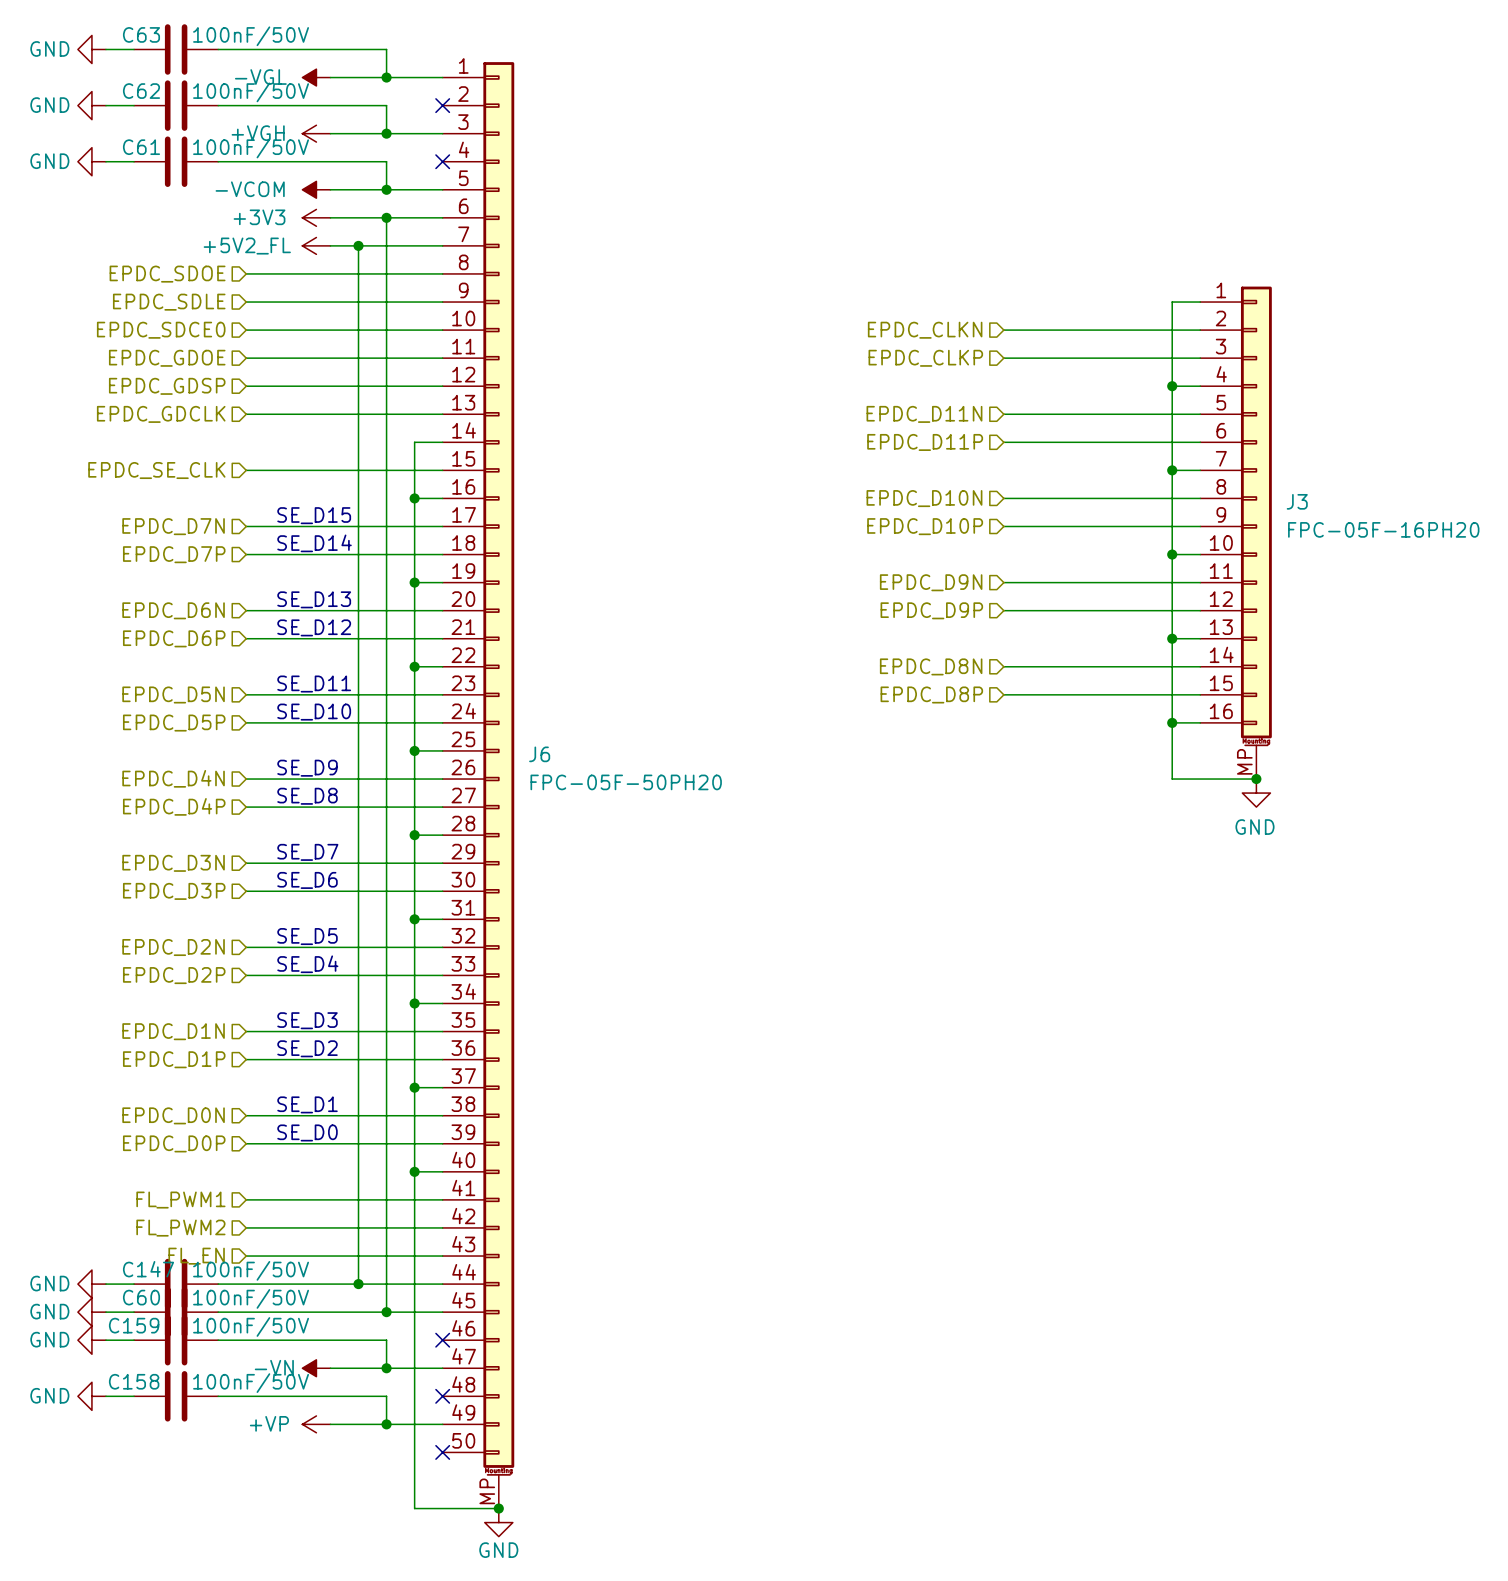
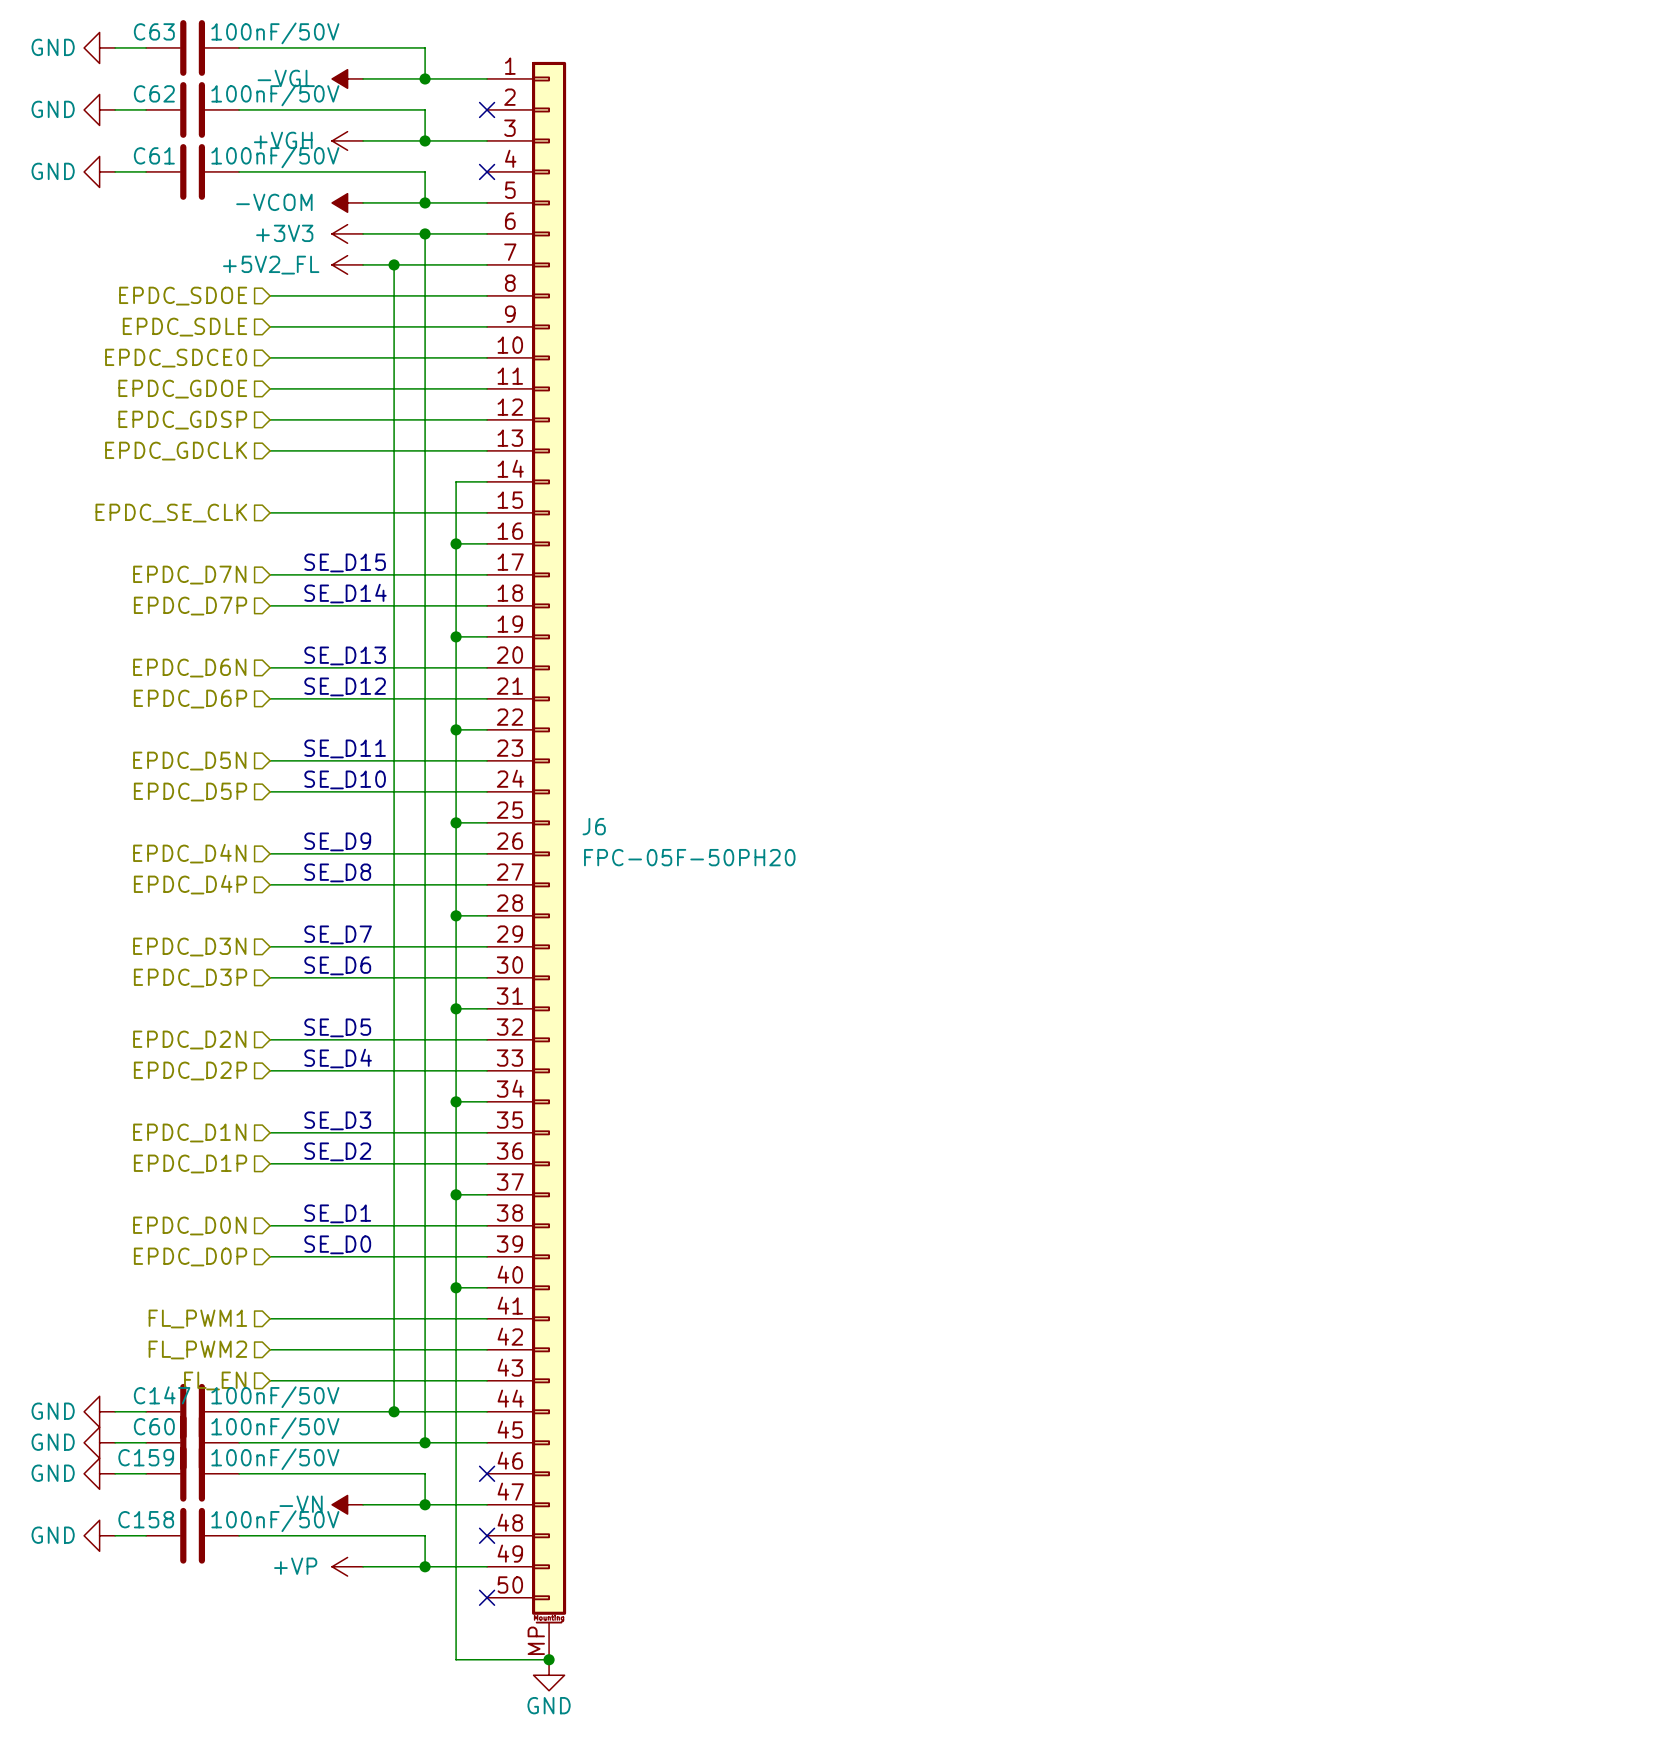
wire: (1200, 302) (1172, 302) (1172, 779) (1256, 779) -> none
hierarchical label: EPDC_CLKN (925, 330) -> none
wire: (1003, 330) (1200, 330) -> none
hierarchical label: EPDC_CLKP (925, 358) -> none
wire: (1003, 358) (1200, 358) -> none
wire: (1172, 386) (1200, 386) -> none
junction: (1172, 386) -> none
hierarchical label: EPDC_D11N (924, 414) -> none
wire: (1003, 414) (1200, 414) -> none
hierarchical label: EPDC_D11P (925, 442) -> none
wire: (1003, 442) (1200, 442) -> none
wire: (1172, 470) (1200, 470) -> none
junction: (1172, 470) -> none
hierarchical label: EPDC_D10N (924, 498) -> none
wire: (1003, 498) (1200, 498) -> none
hierarchical label: EPDC_D10P (925, 526) -> none
wire: (1003, 526) (1200, 526) -> none
J3: FPC-05F-16PH20 (1236, 532) -> none
wire: (1172, 554) (1200, 554) -> none
junction: (1172, 554) -> none
hierarchical label: EPDC_D9N (931, 582) -> none
wire: (1003, 582) (1200, 582) -> none
hierarchical label: EPDC_D9P (931, 610) -> none
wire: (1003, 610) (1200, 610) -> none
wire: (1172, 638) (1200, 638) -> none
junction: (1172, 638) -> none
hierarchical label: EPDC_D8N (931, 666) -> none
wire: (1003, 666) (1200, 666) -> none
hierarchical label: EPDC_D8P (931, 694) -> none
wire: (1003, 694) (1200, 694) -> none
wire: (1172, 722) (1200, 722) -> none
junction: (1172, 722) -> none
junction: (1256, 779) -> none
power symbol: GND (1256, 793) -> none

